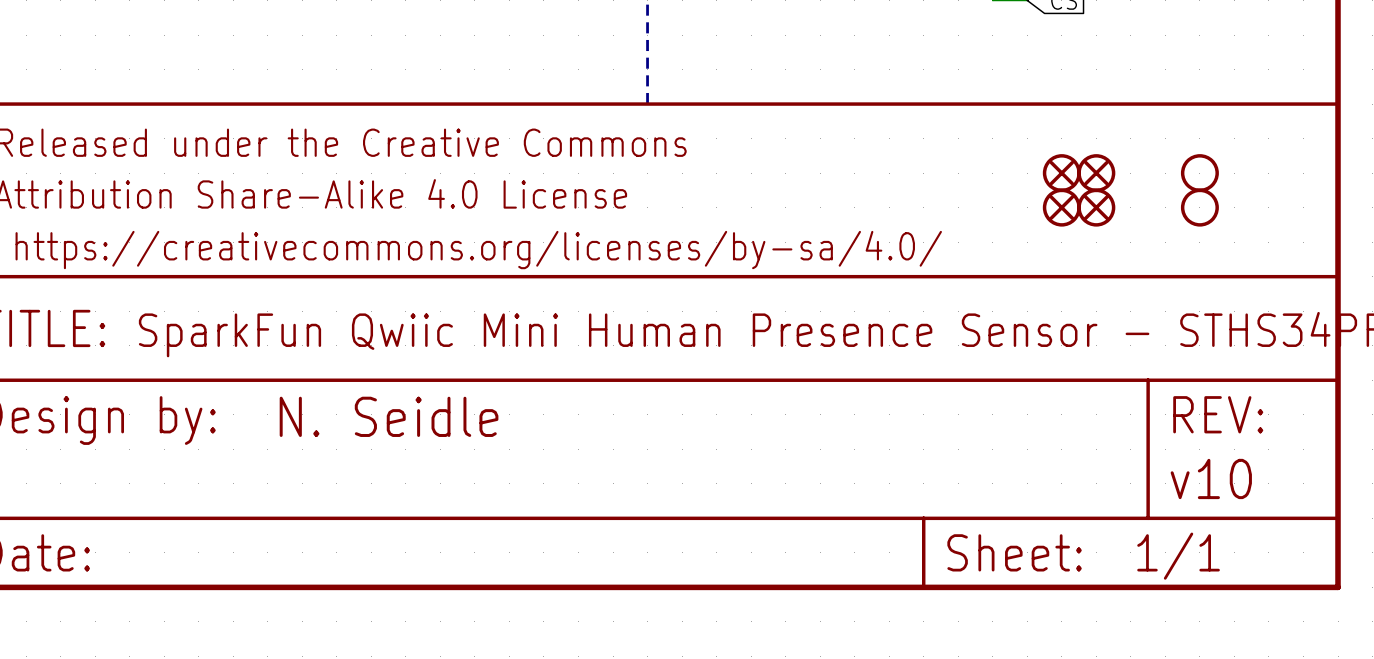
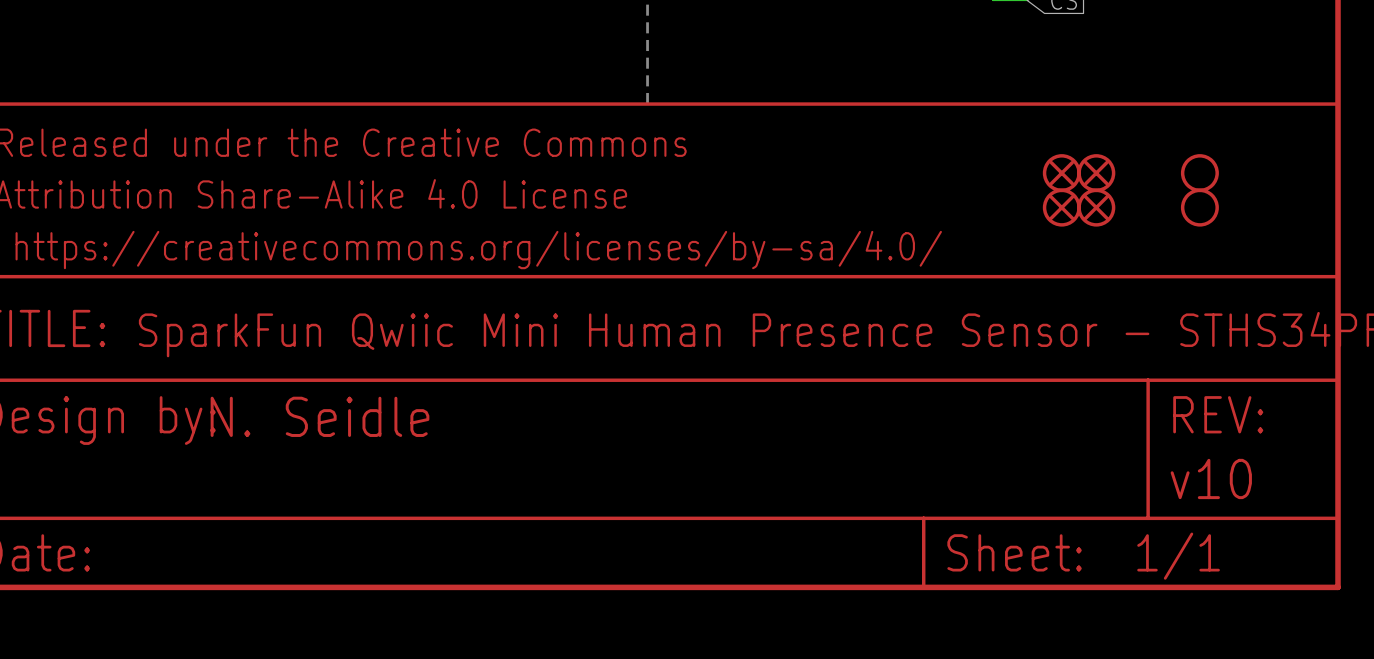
part text position: N. Seidle (389, 416) -> N. Seidle (320, 416)

